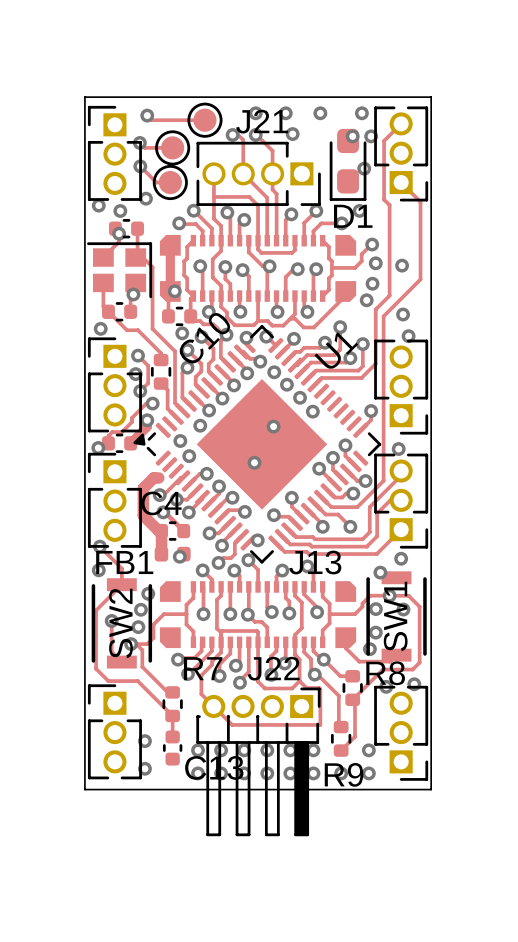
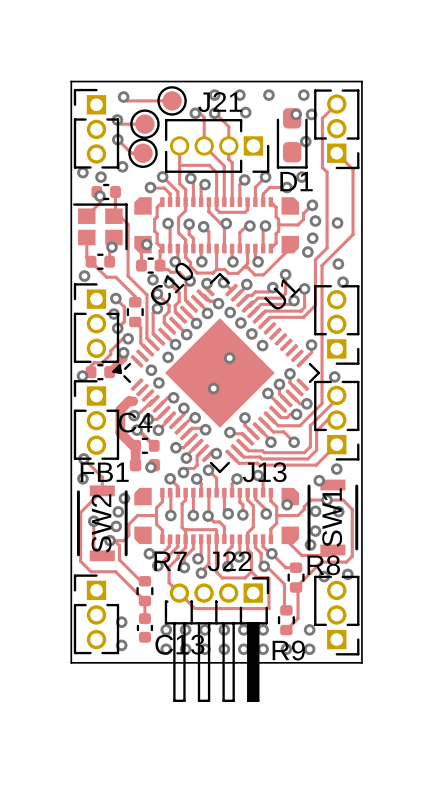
track: (170, 245) (170, 291) -> none
via: none -> (287, 504)

